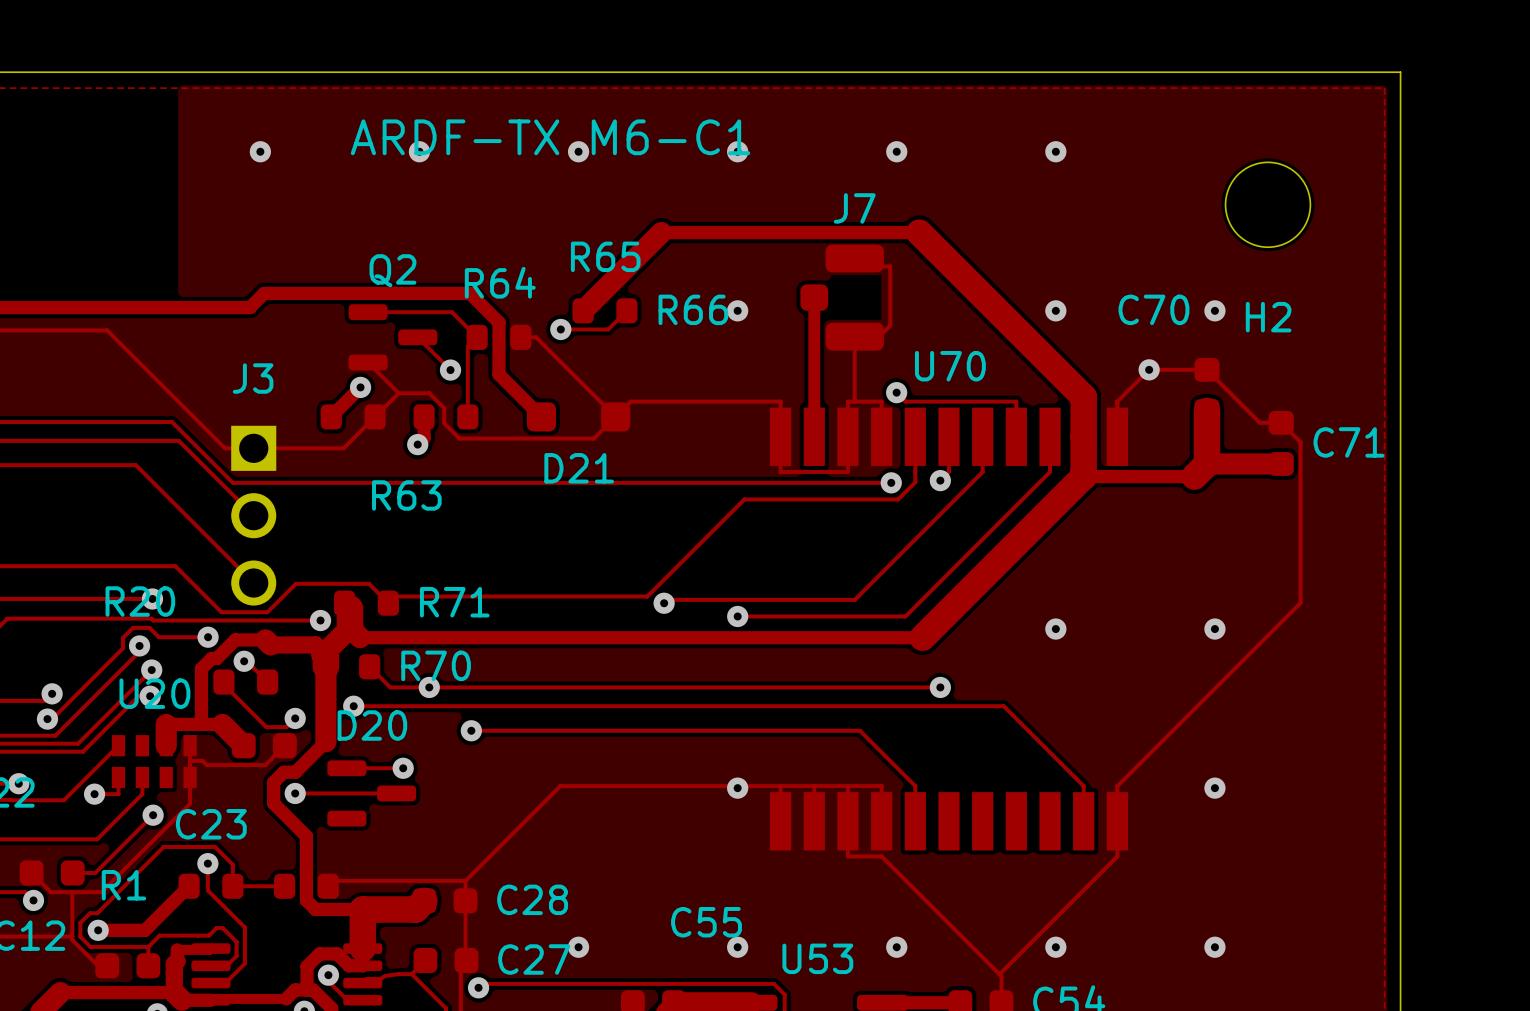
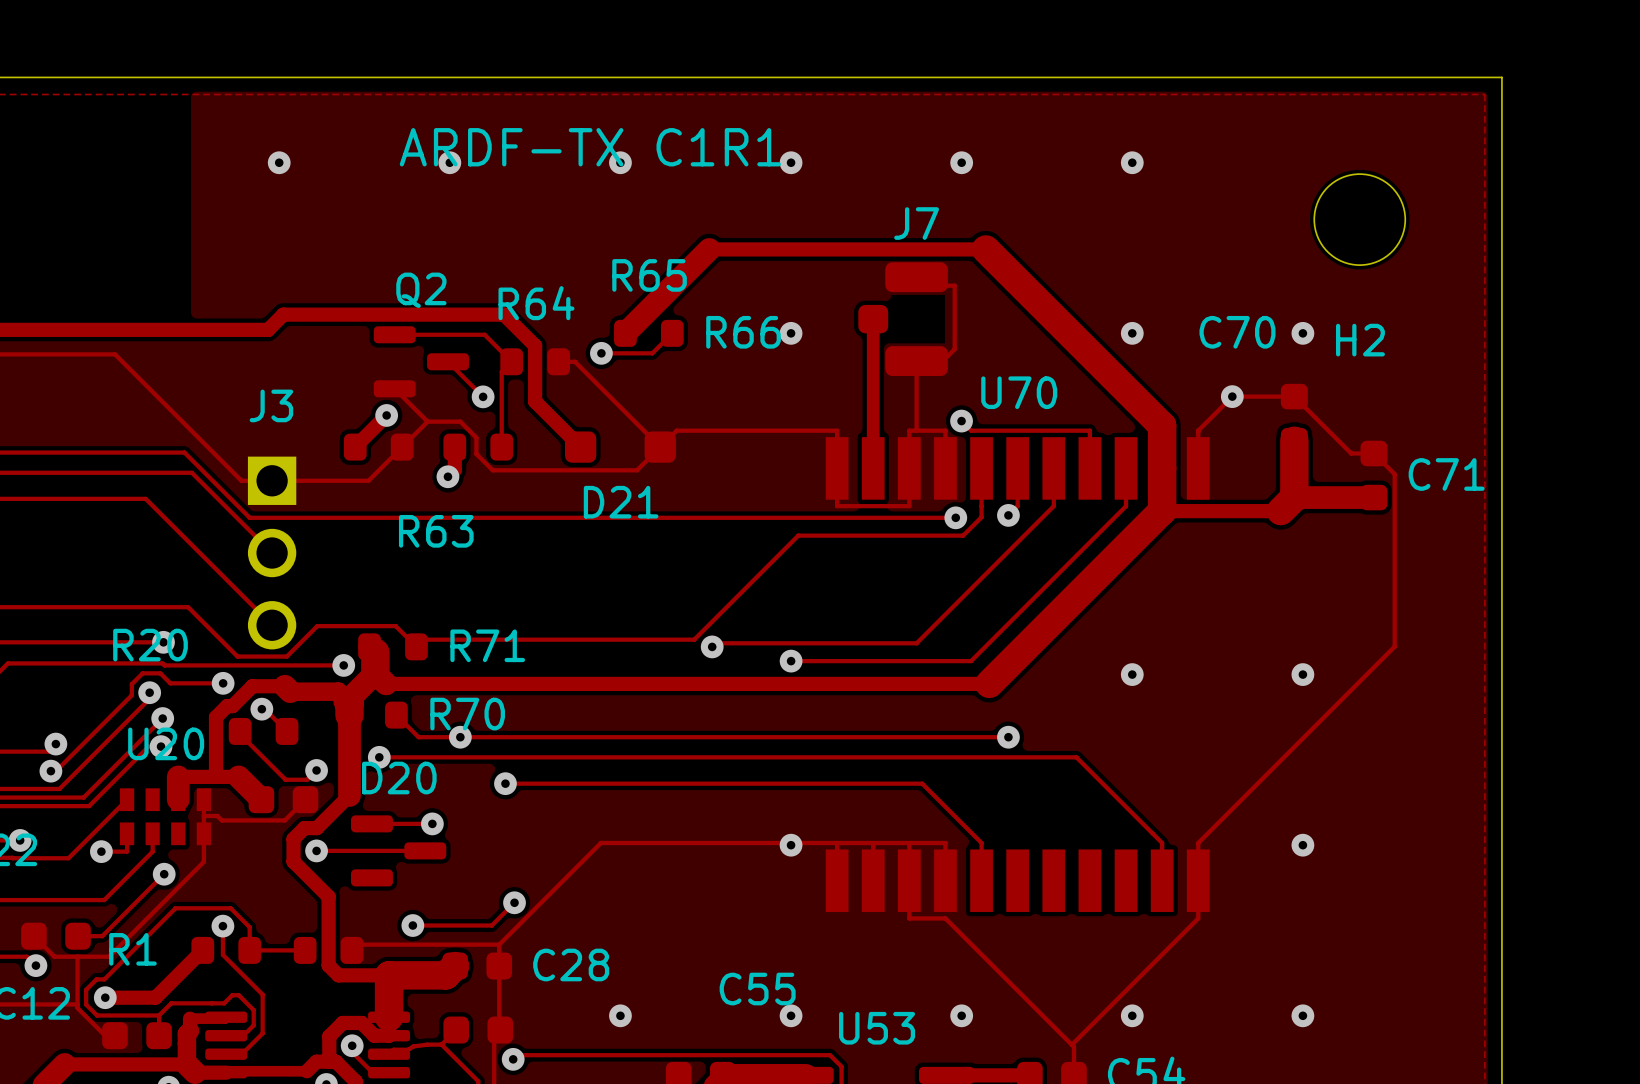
text: ARDF-TX M6-C1 (550, 137) -> ARDF-TX C1R1 (590, 147)
text: C23 (211, 824) -> none
track: none -> (514, 902) (491, 925) (412, 925)
via: none -> (514, 902)
via: none -> (412, 925)
text: C27 (534, 959) -> none

